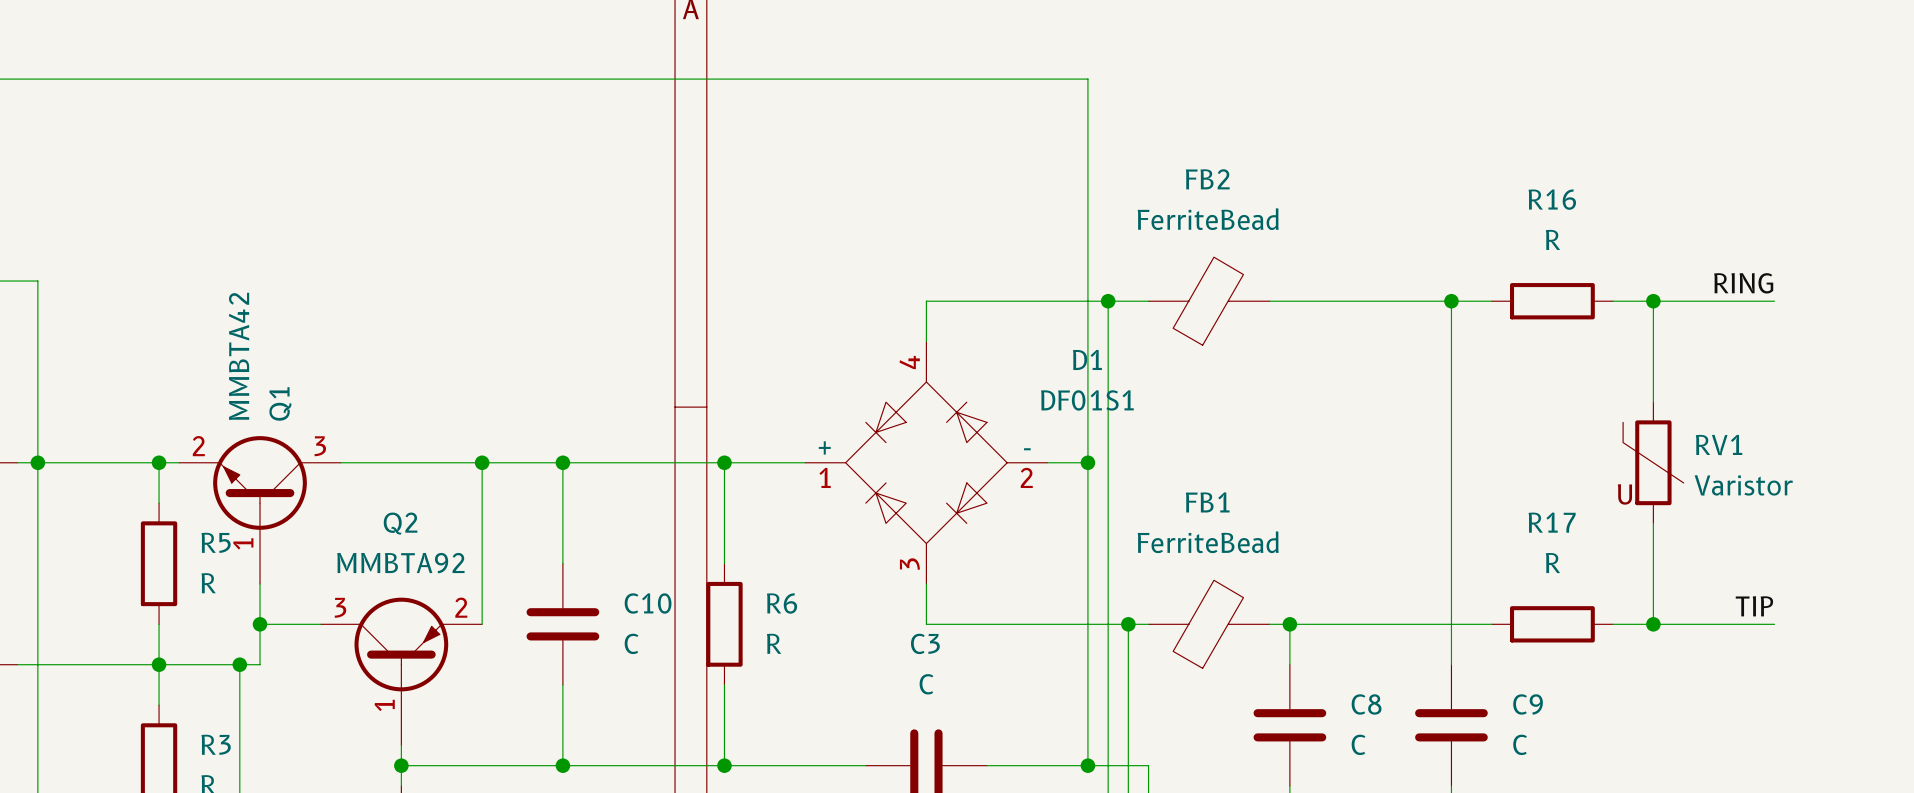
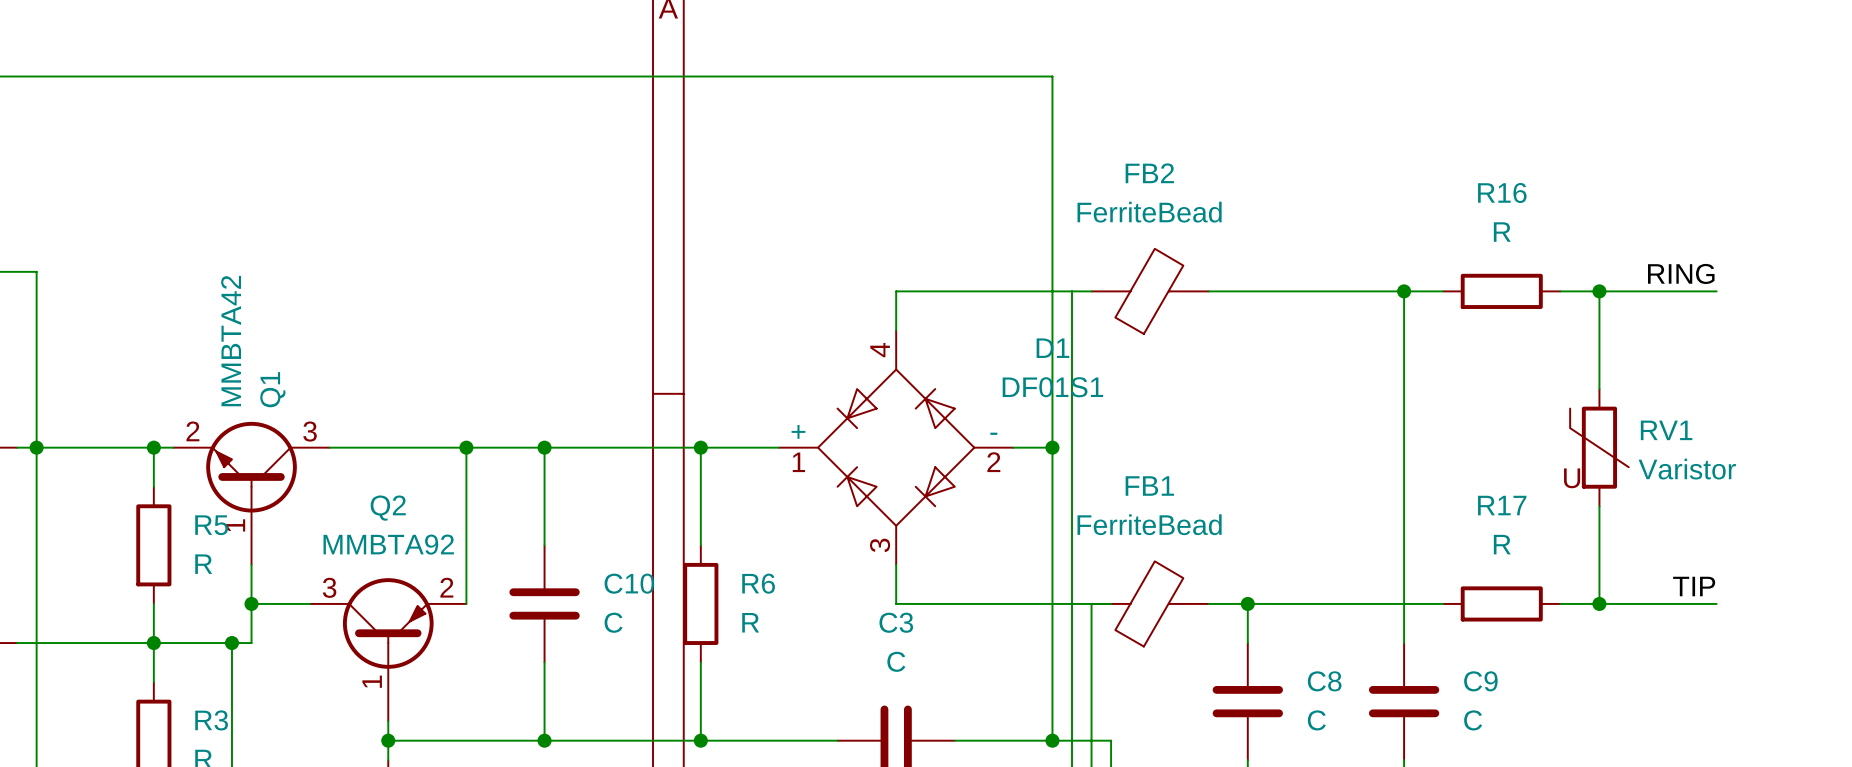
junction: (1108, 301) -> none
FB2 position: (1209, 301) -> (1150, 291)
junction: (1128, 624) -> none
FB1 position: (1209, 624) -> (1150, 603)

